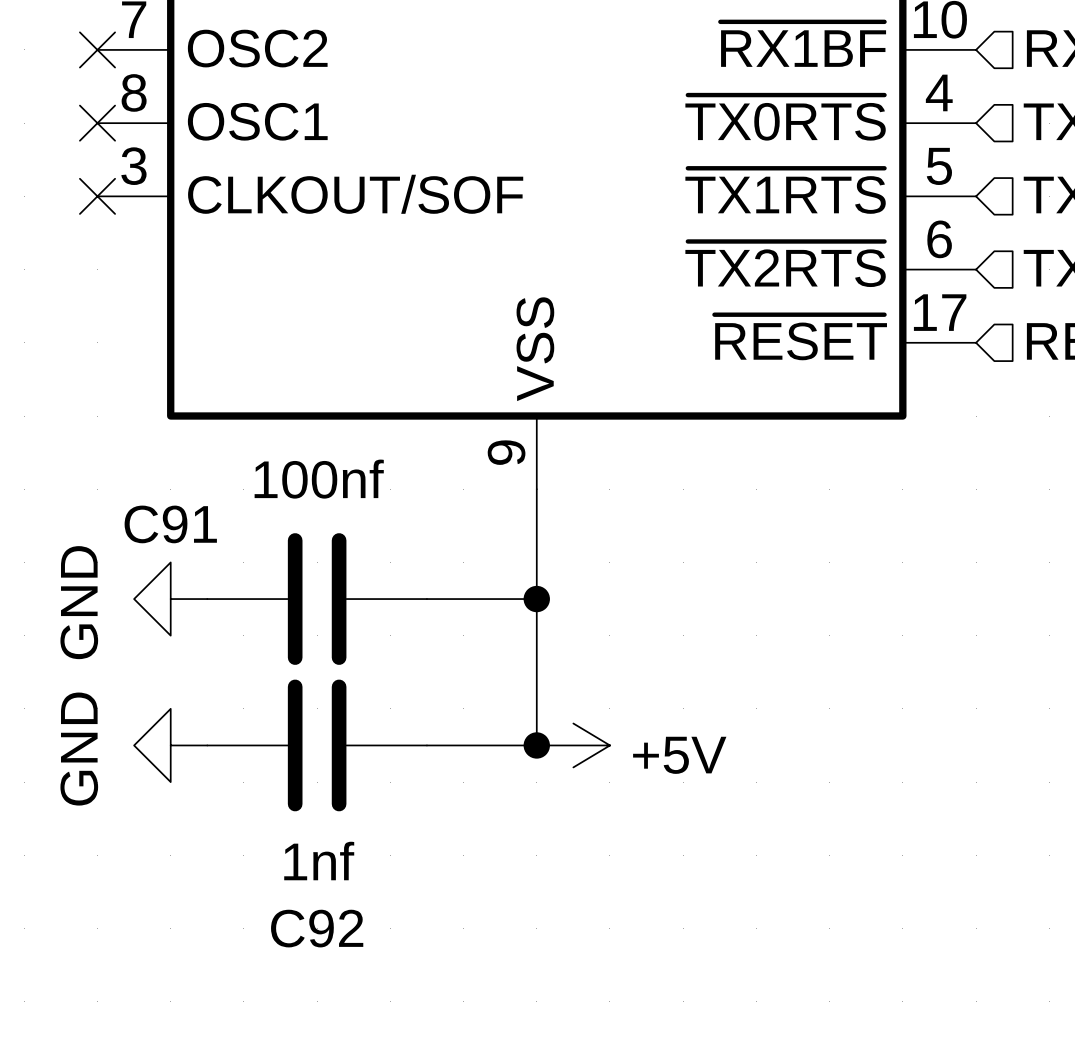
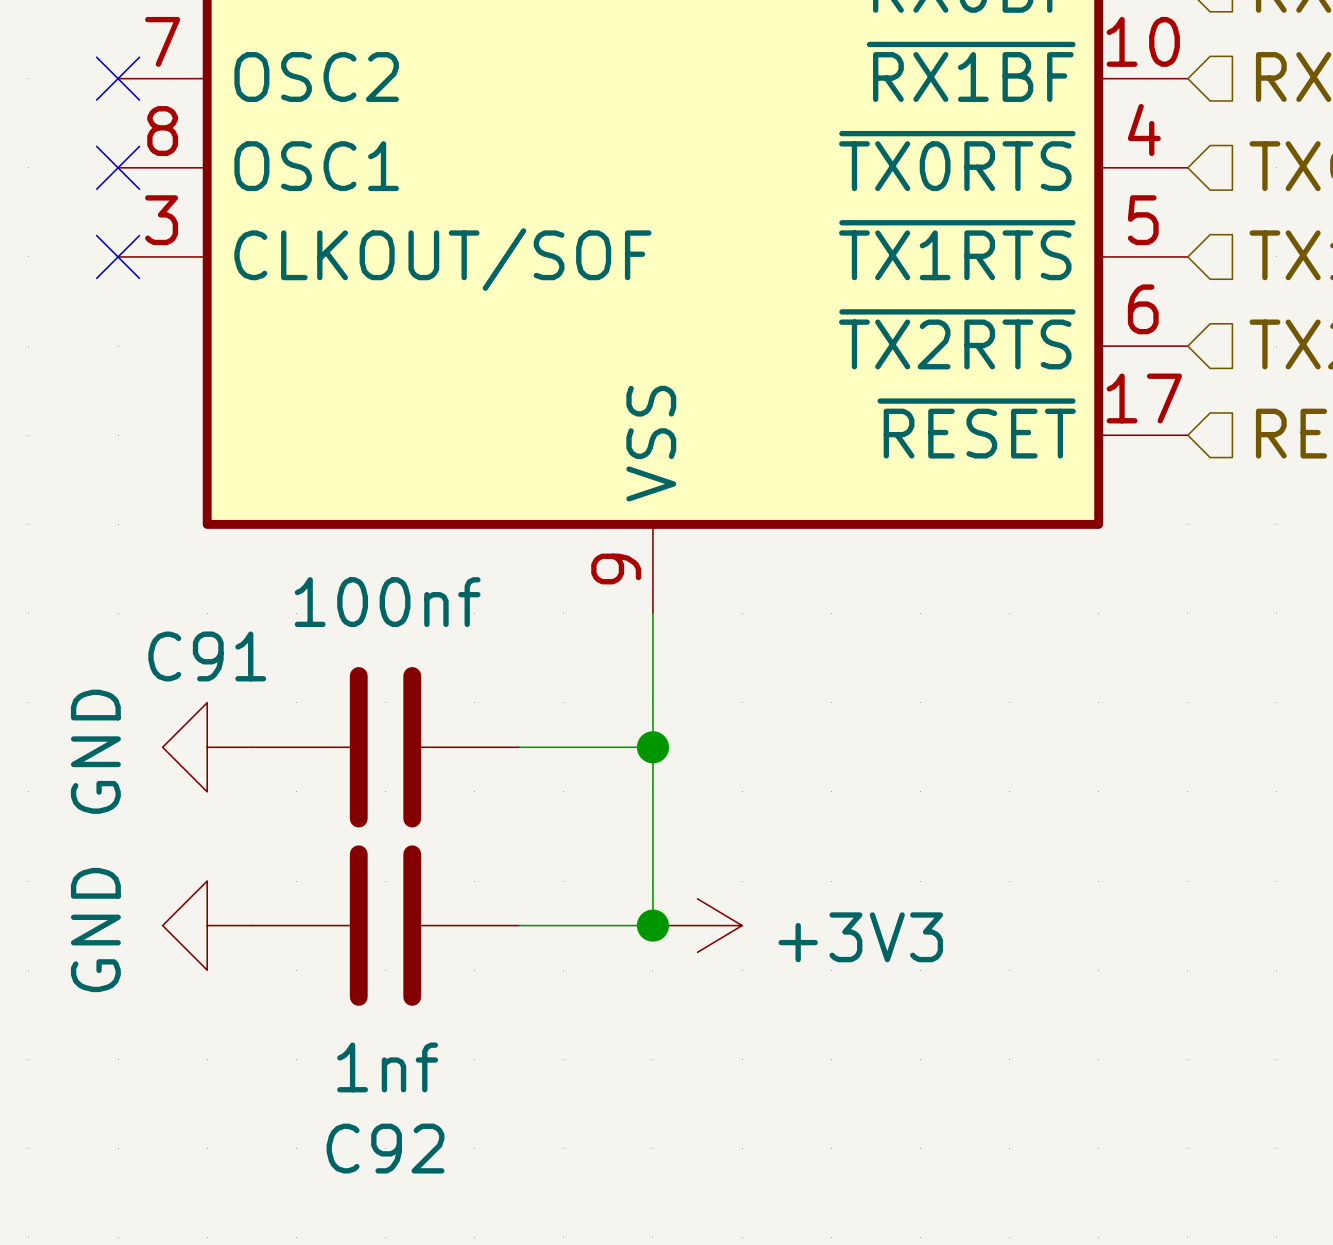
power symbol: +5V (573, 745) -> +3V3 (697, 925)

